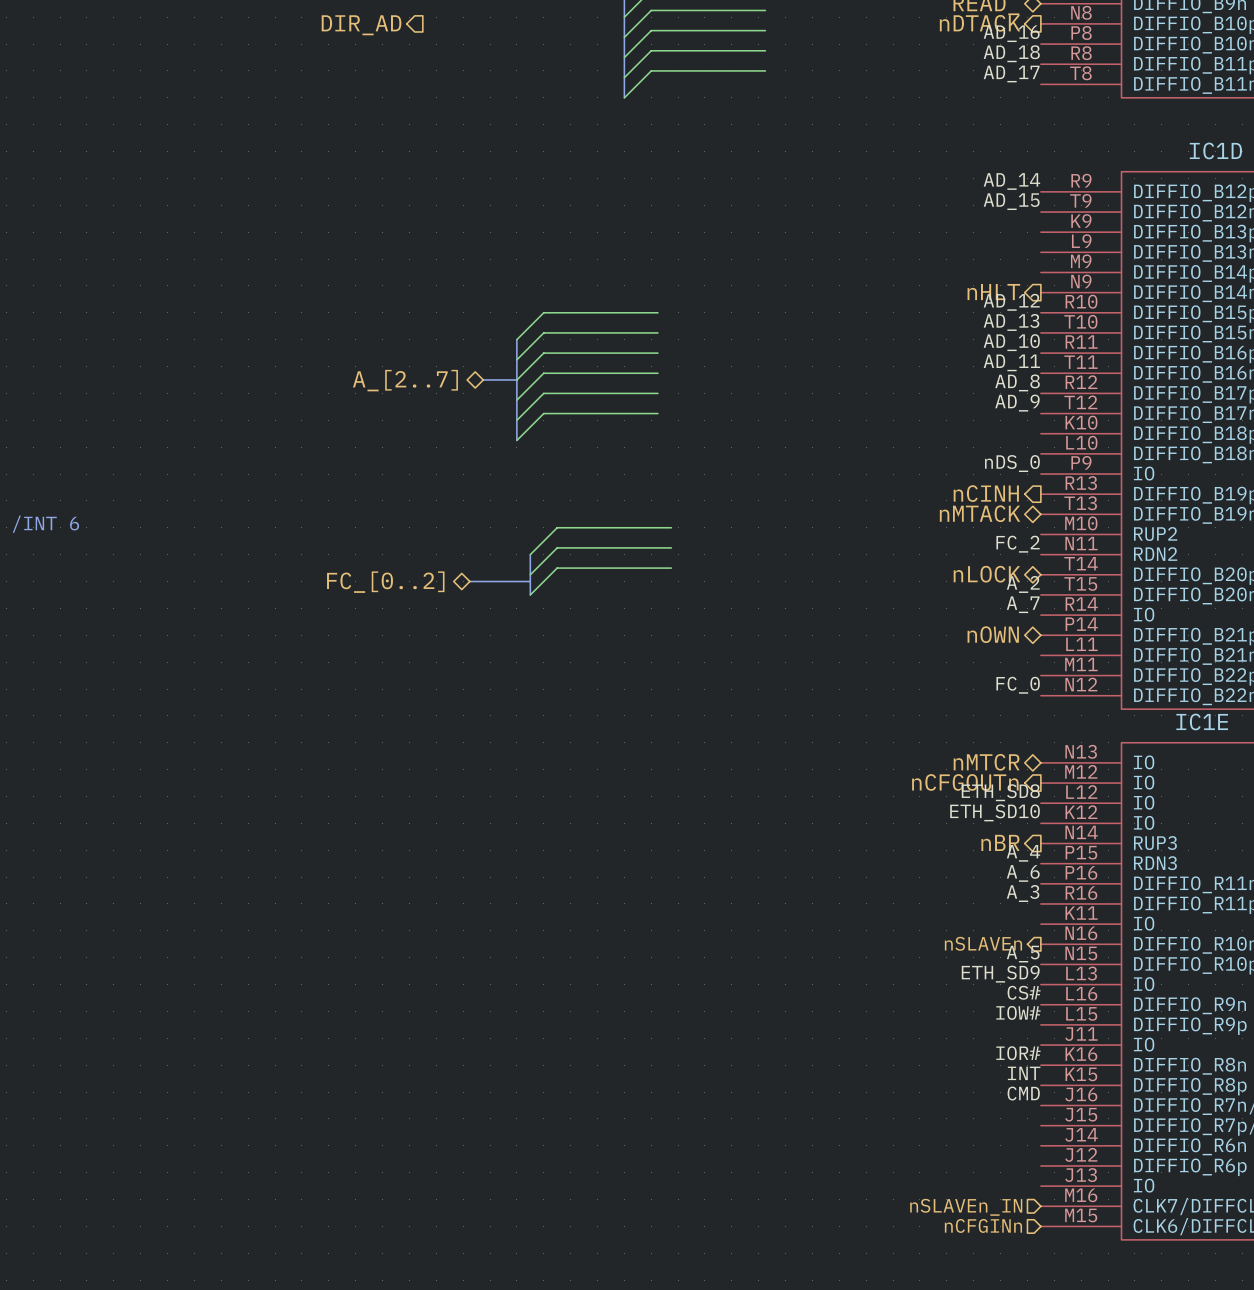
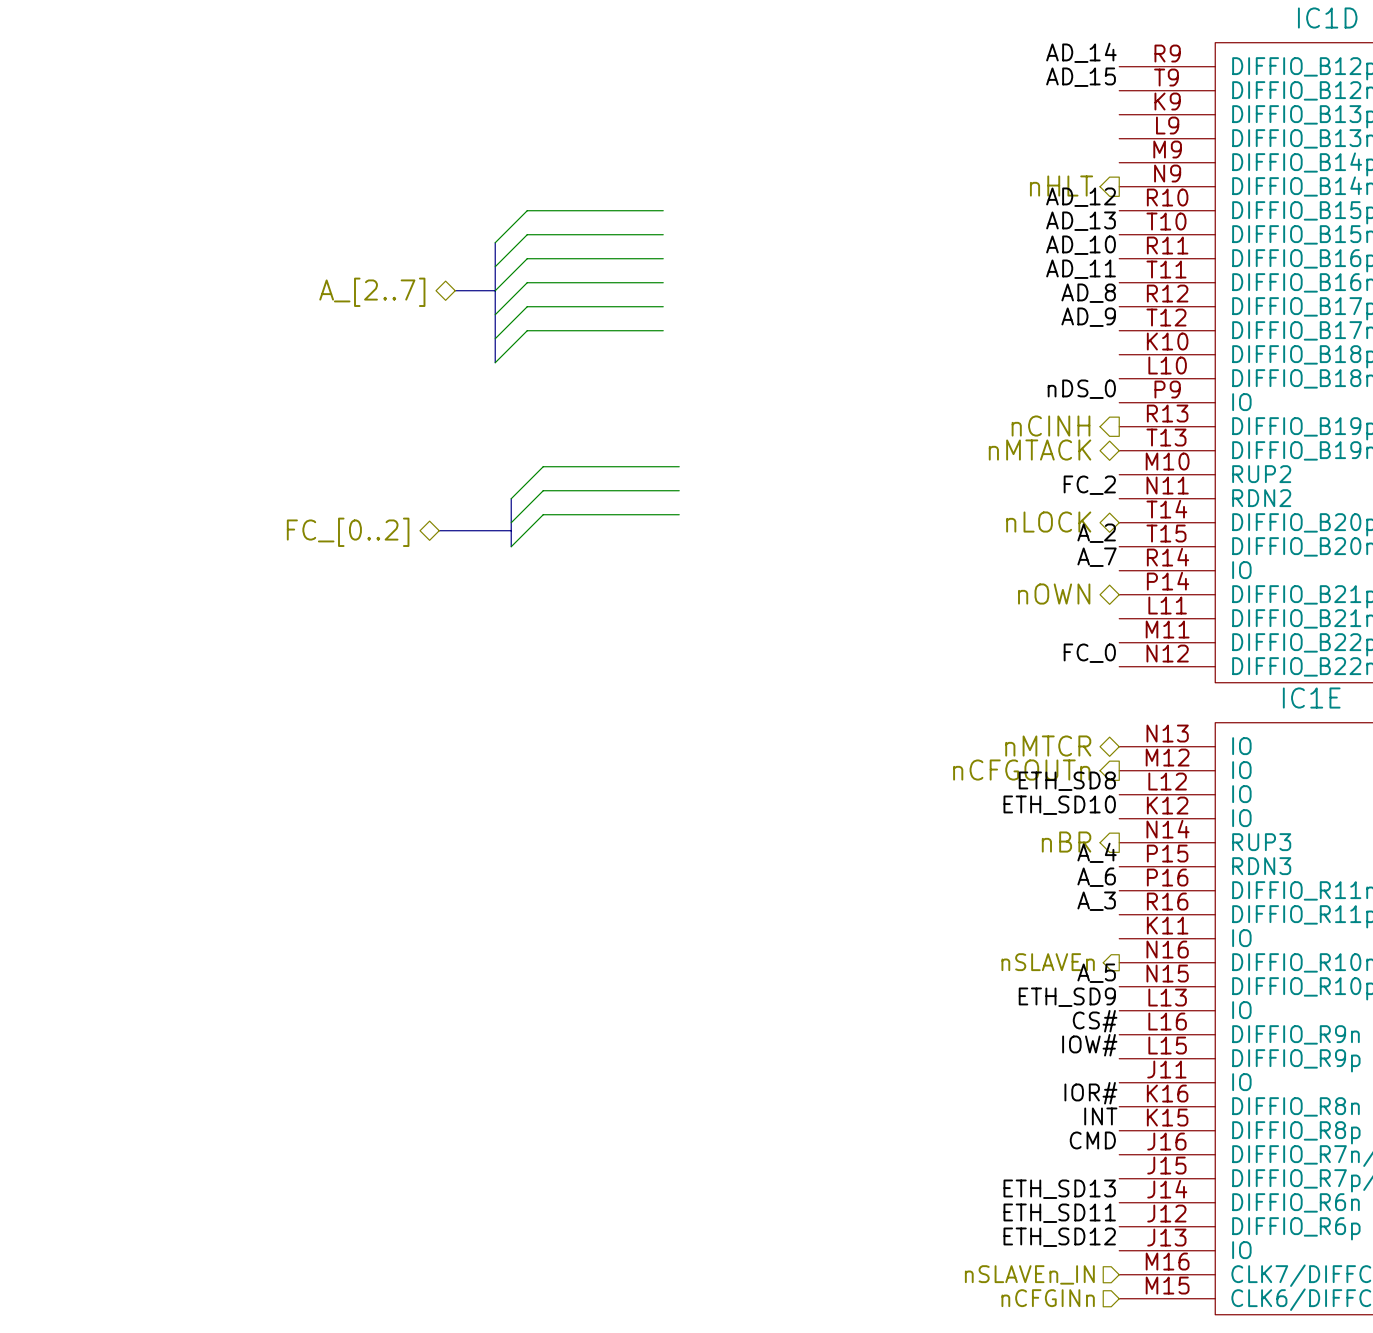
label: none -> ETH_SD13 (1059, 1189)
label: none -> ETH_SD11 (1059, 1213)
label: none -> ETH_SD12 (1059, 1237)

